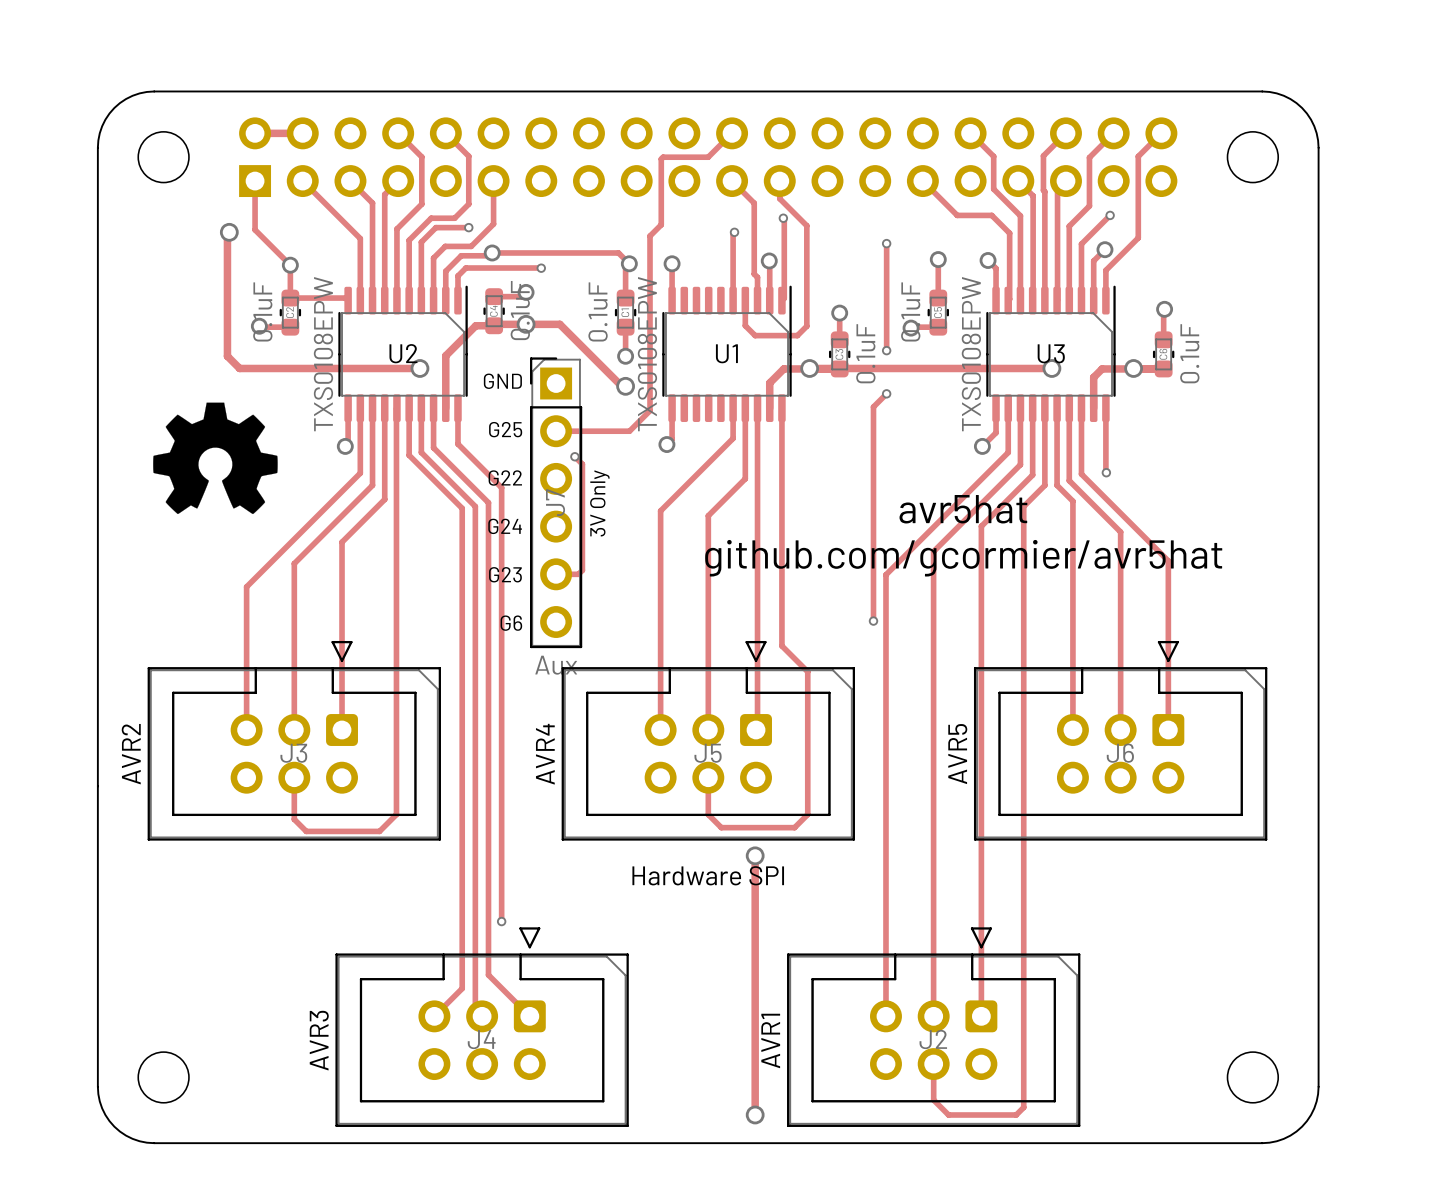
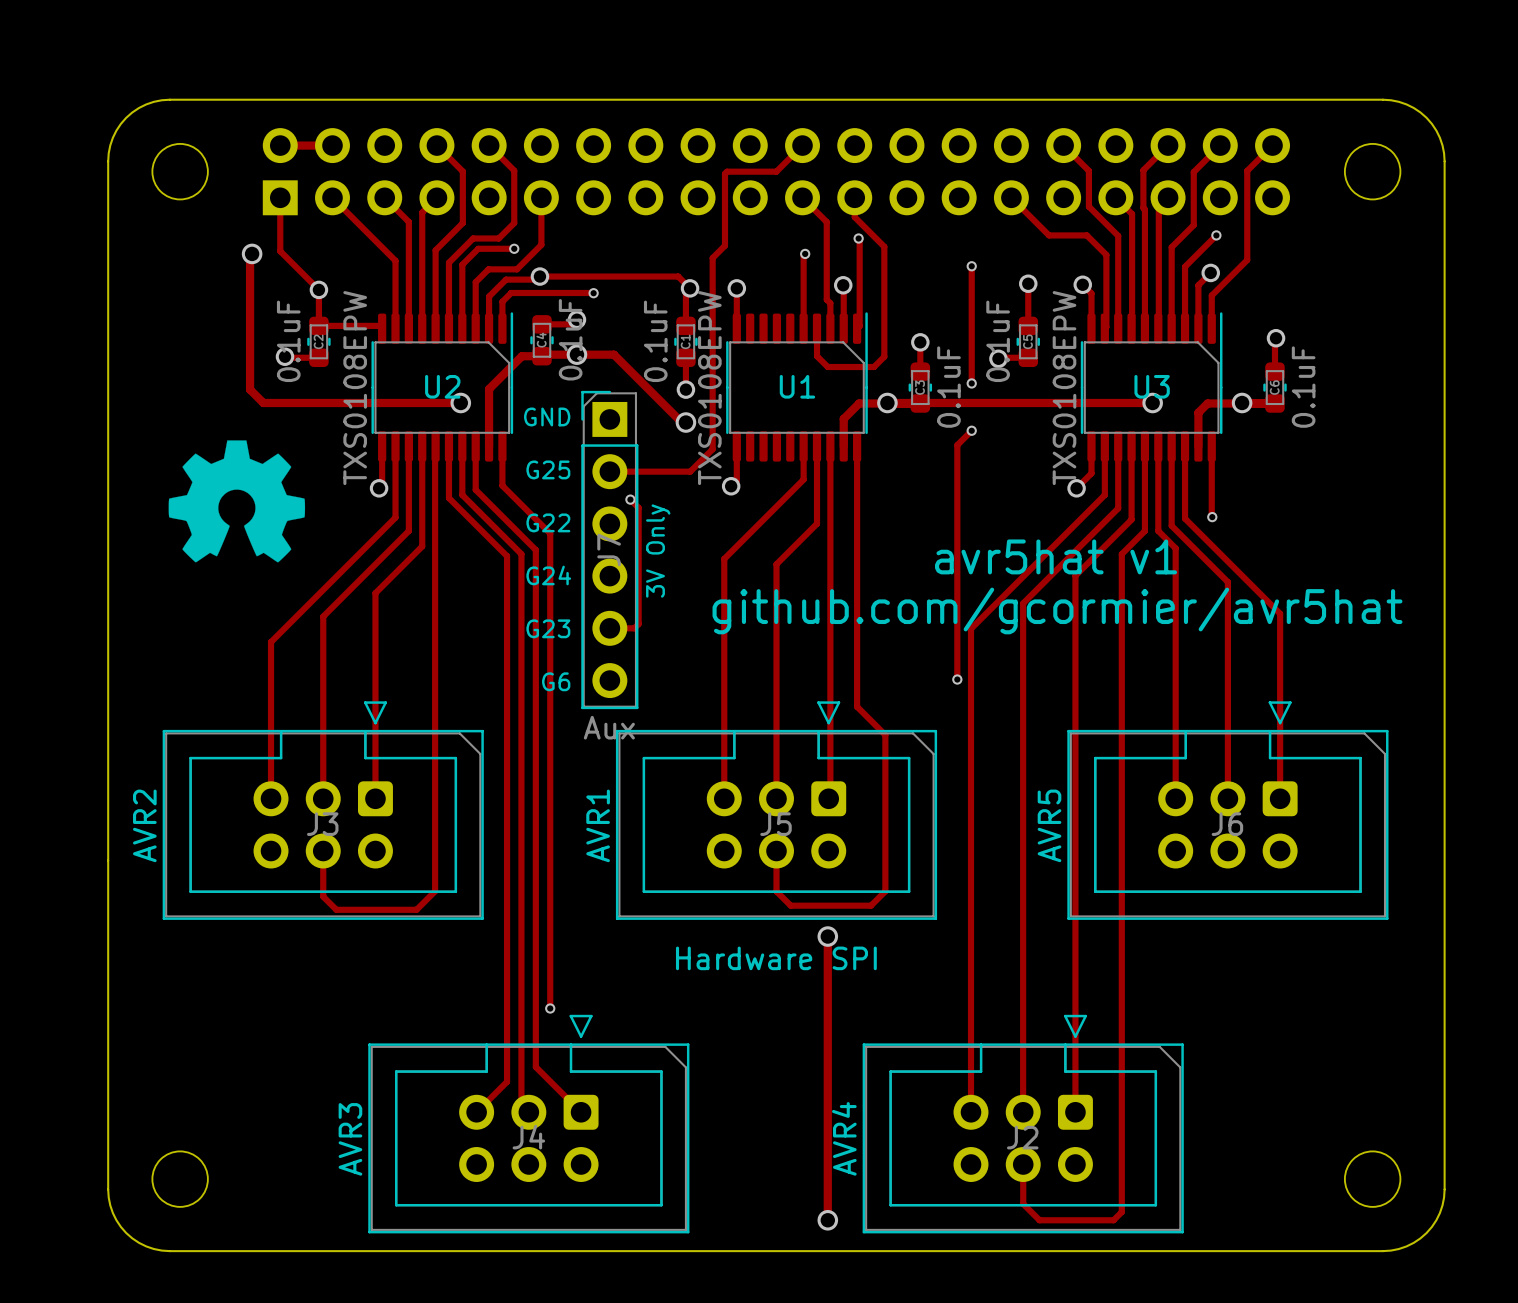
text: avr5hat (963, 509) -> avr5hat v1 (1056, 556)
J5 value: AVR4 (545, 754) -> AVR1 (598, 825)
J2 value: AVR1 (770, 1041) -> AVR4 (844, 1138)

